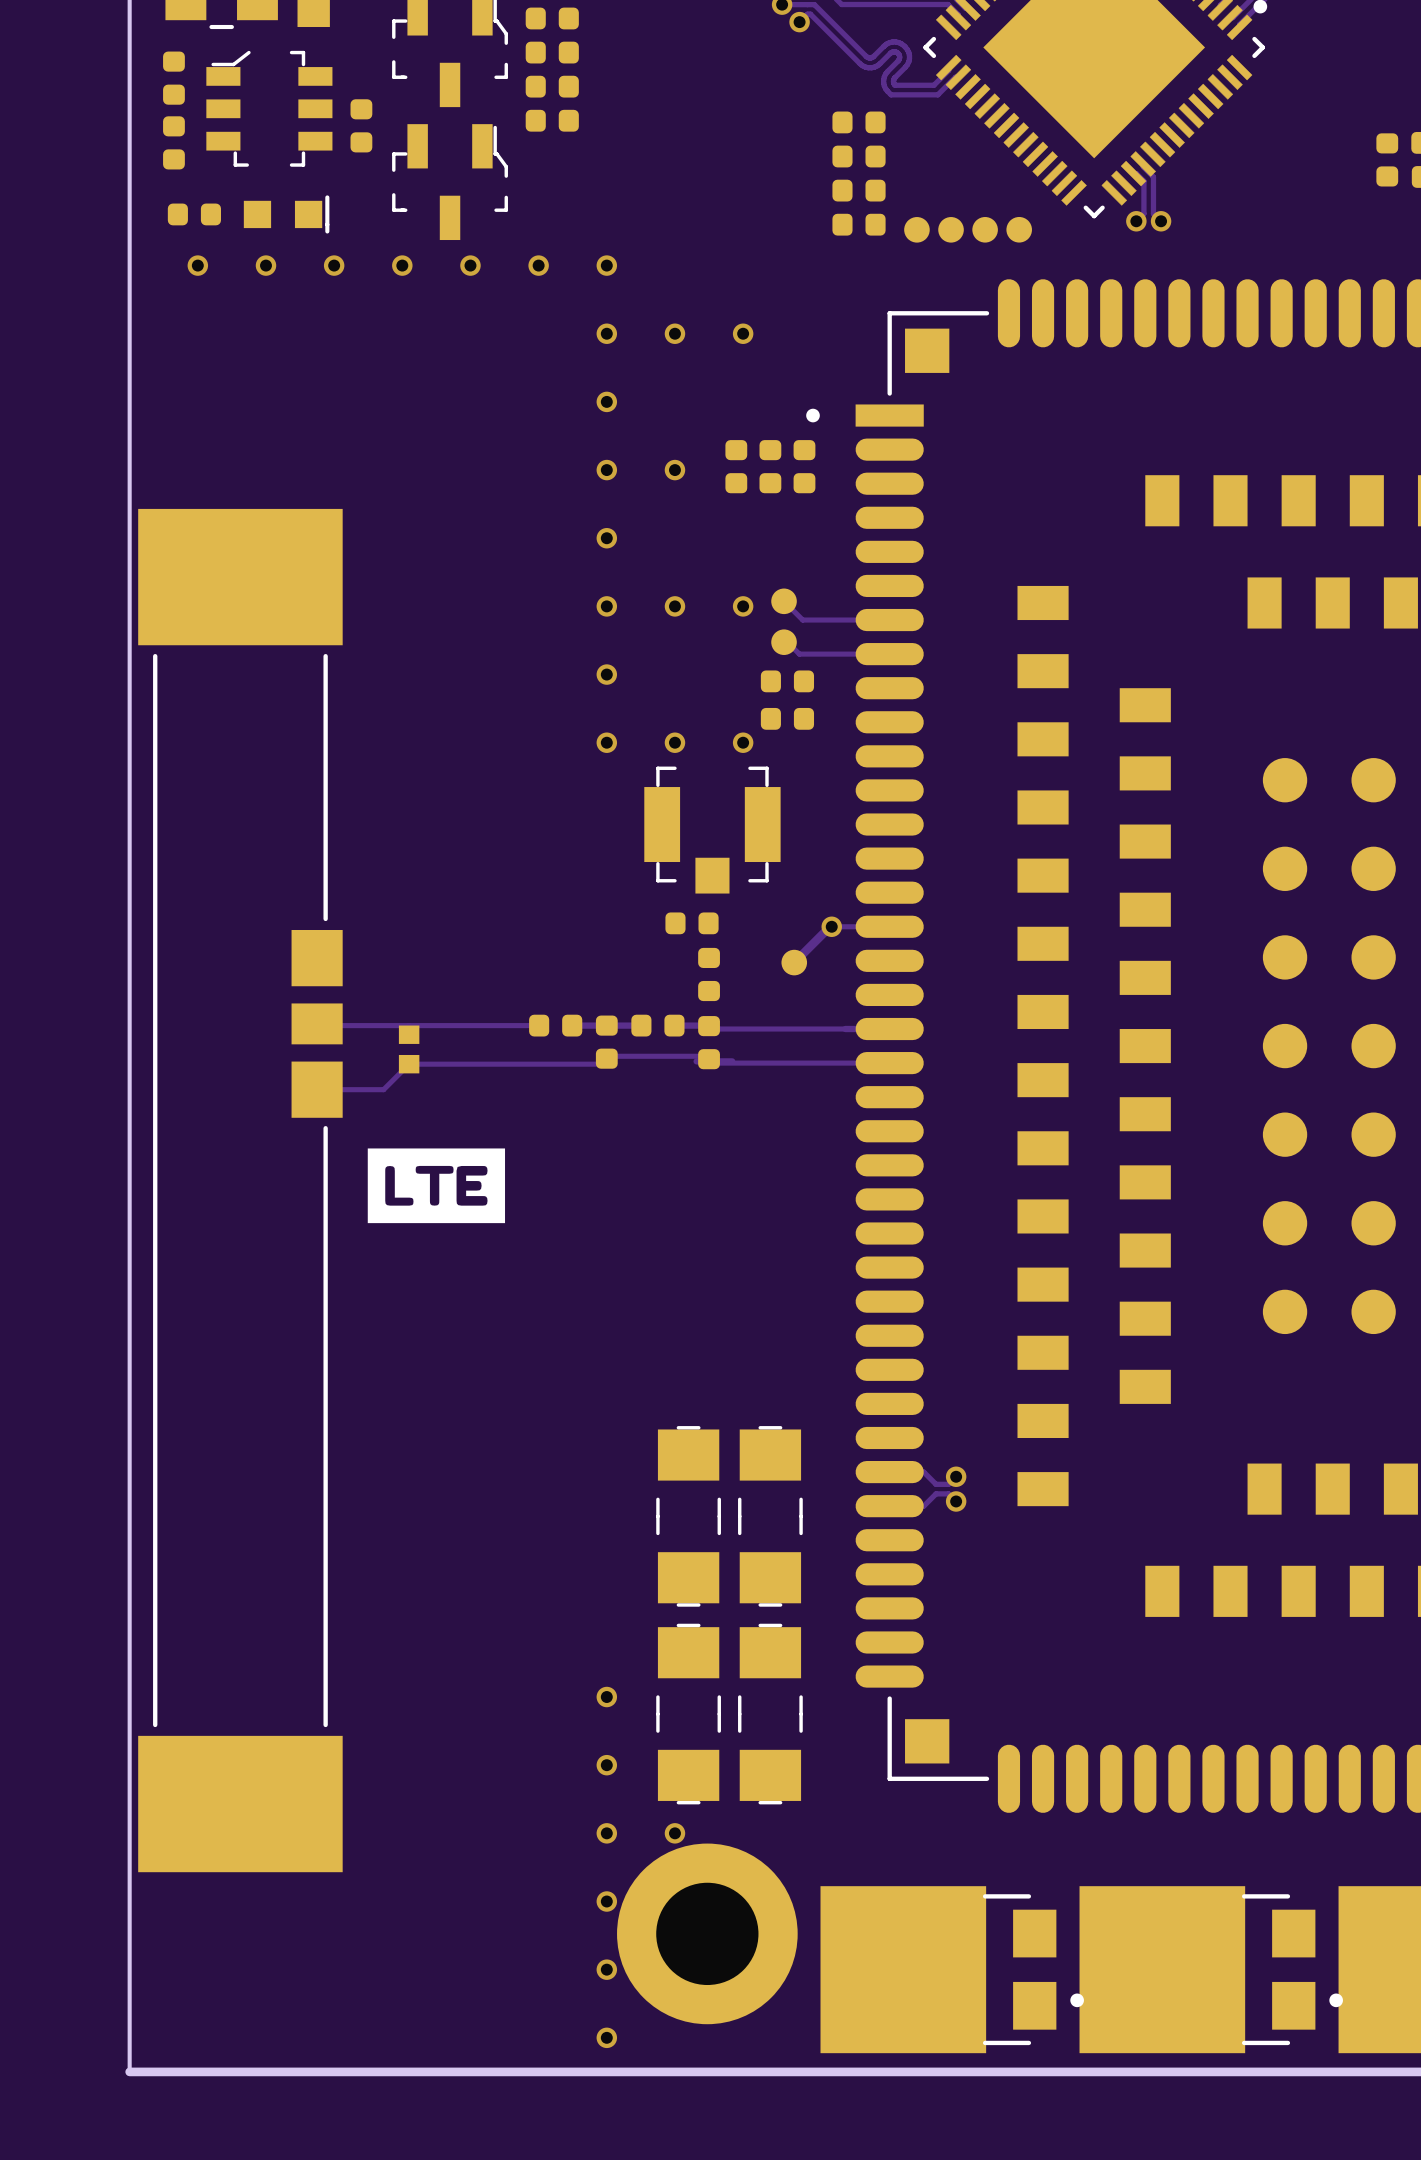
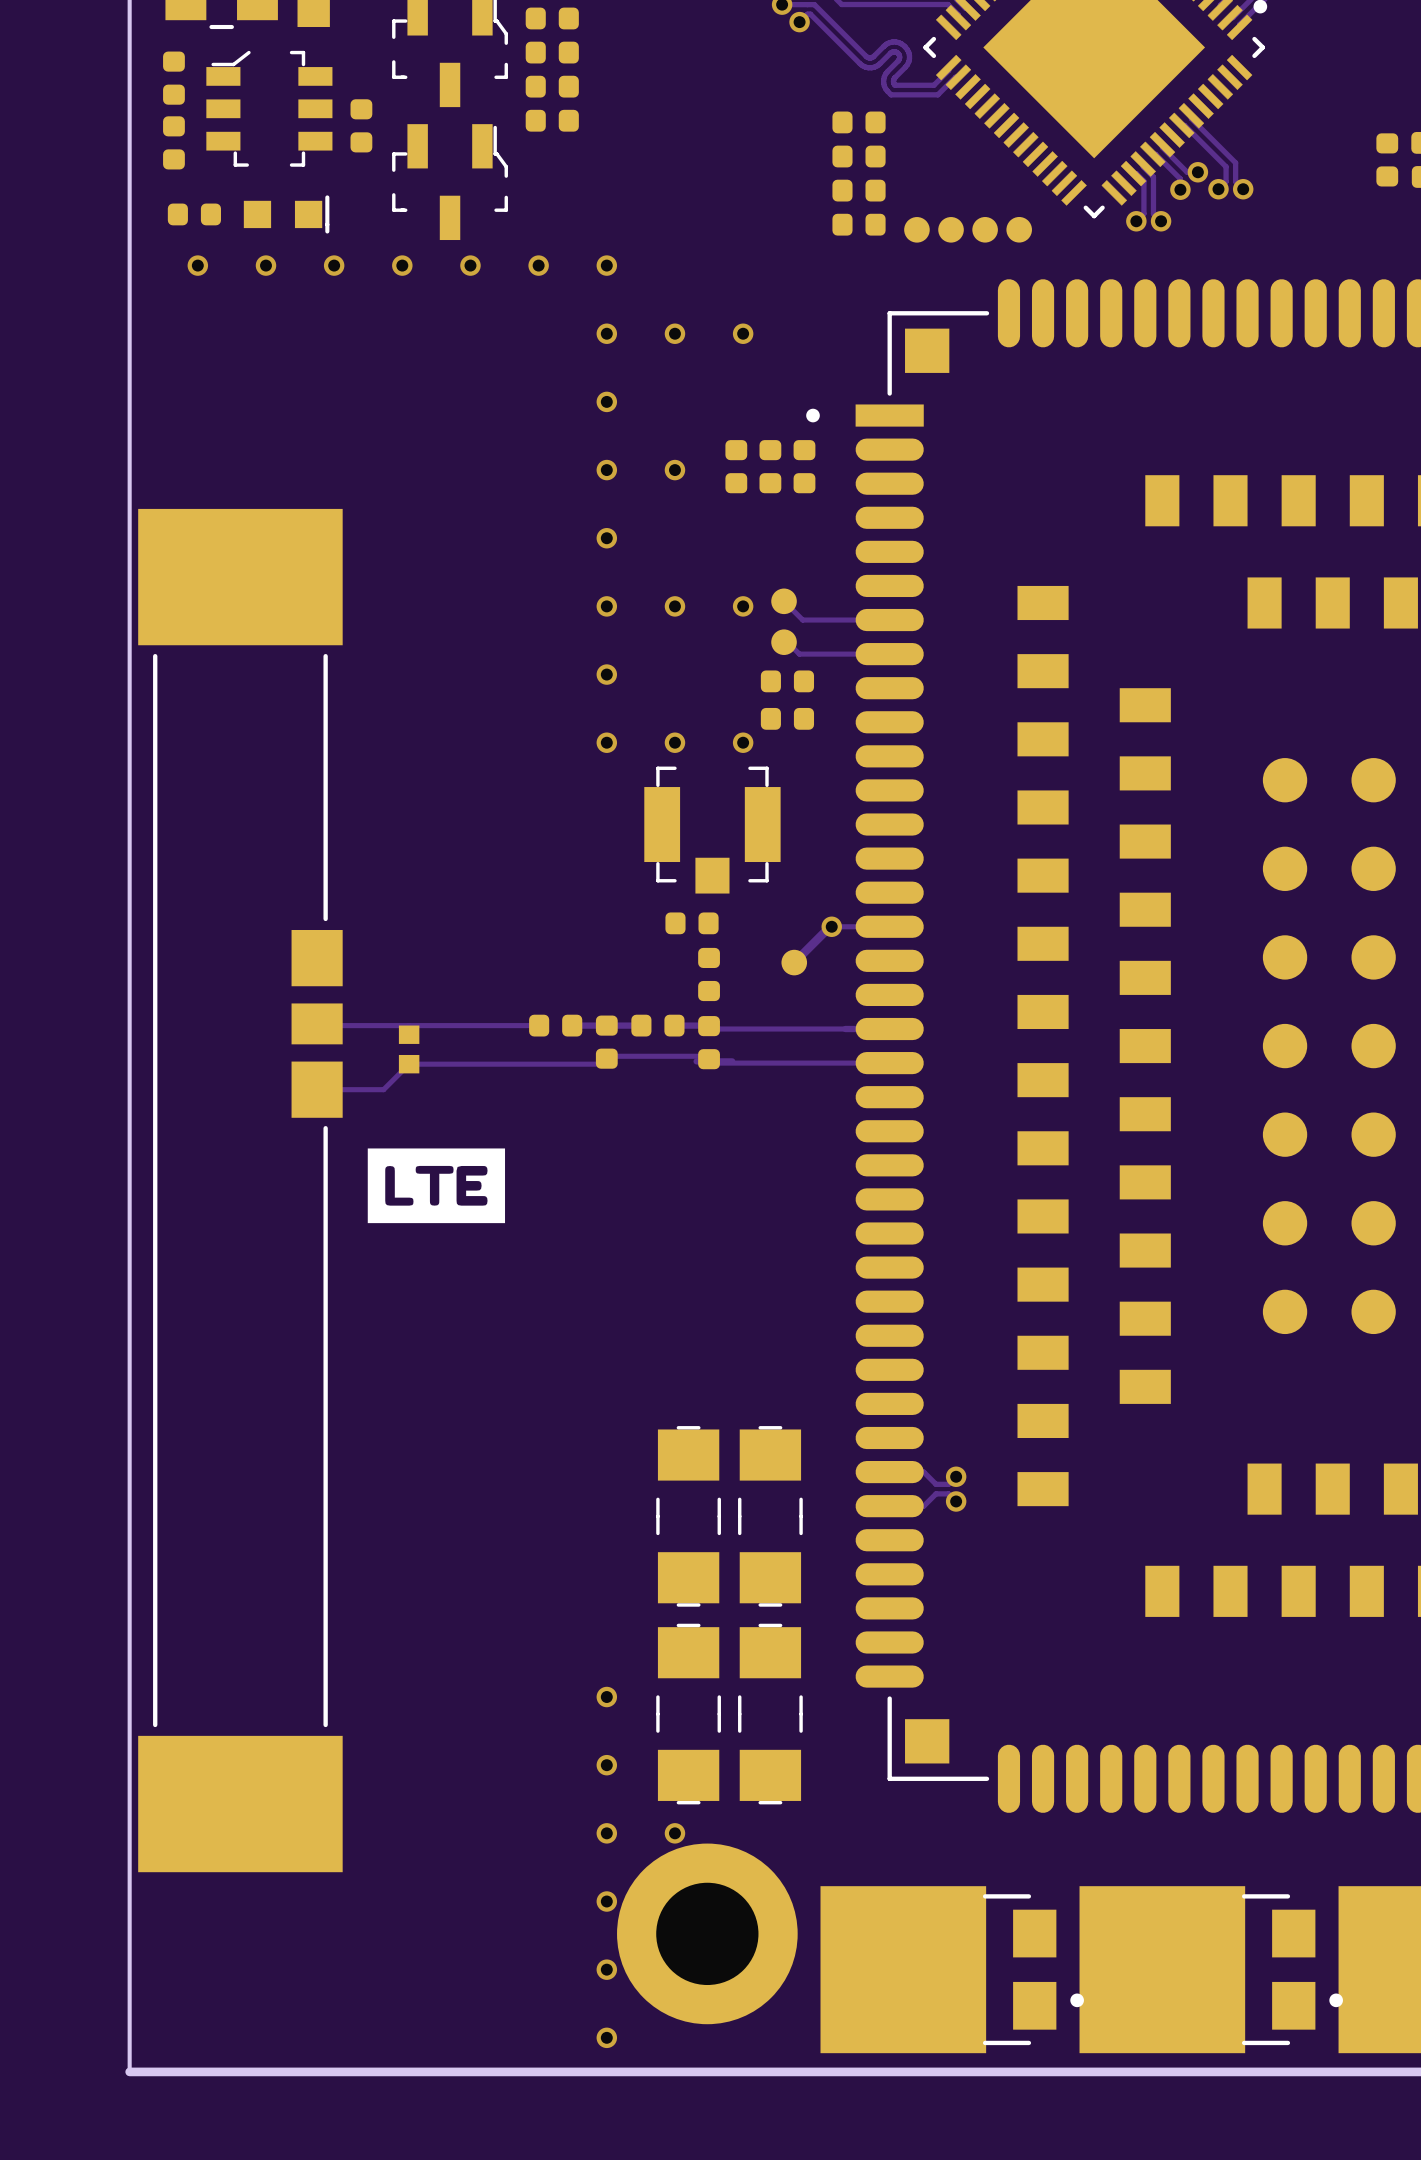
track: none -> (1191, 115) (1191, 118) (1235, 162) (1235, 181) (1243, 189)
track: none -> (1181, 125) (1184, 125) (1226, 166) (1226, 181) (1218, 189)
track: none -> (1162, 144) (1162, 147) (1187, 172) (1197, 172)
track: none -> (1152, 154) (1155, 154) (1180, 179) (1180, 189)
via: none -> (1197, 172)
via: none -> (1180, 189)
via: none -> (1218, 189)
via: none -> (1243, 189)

